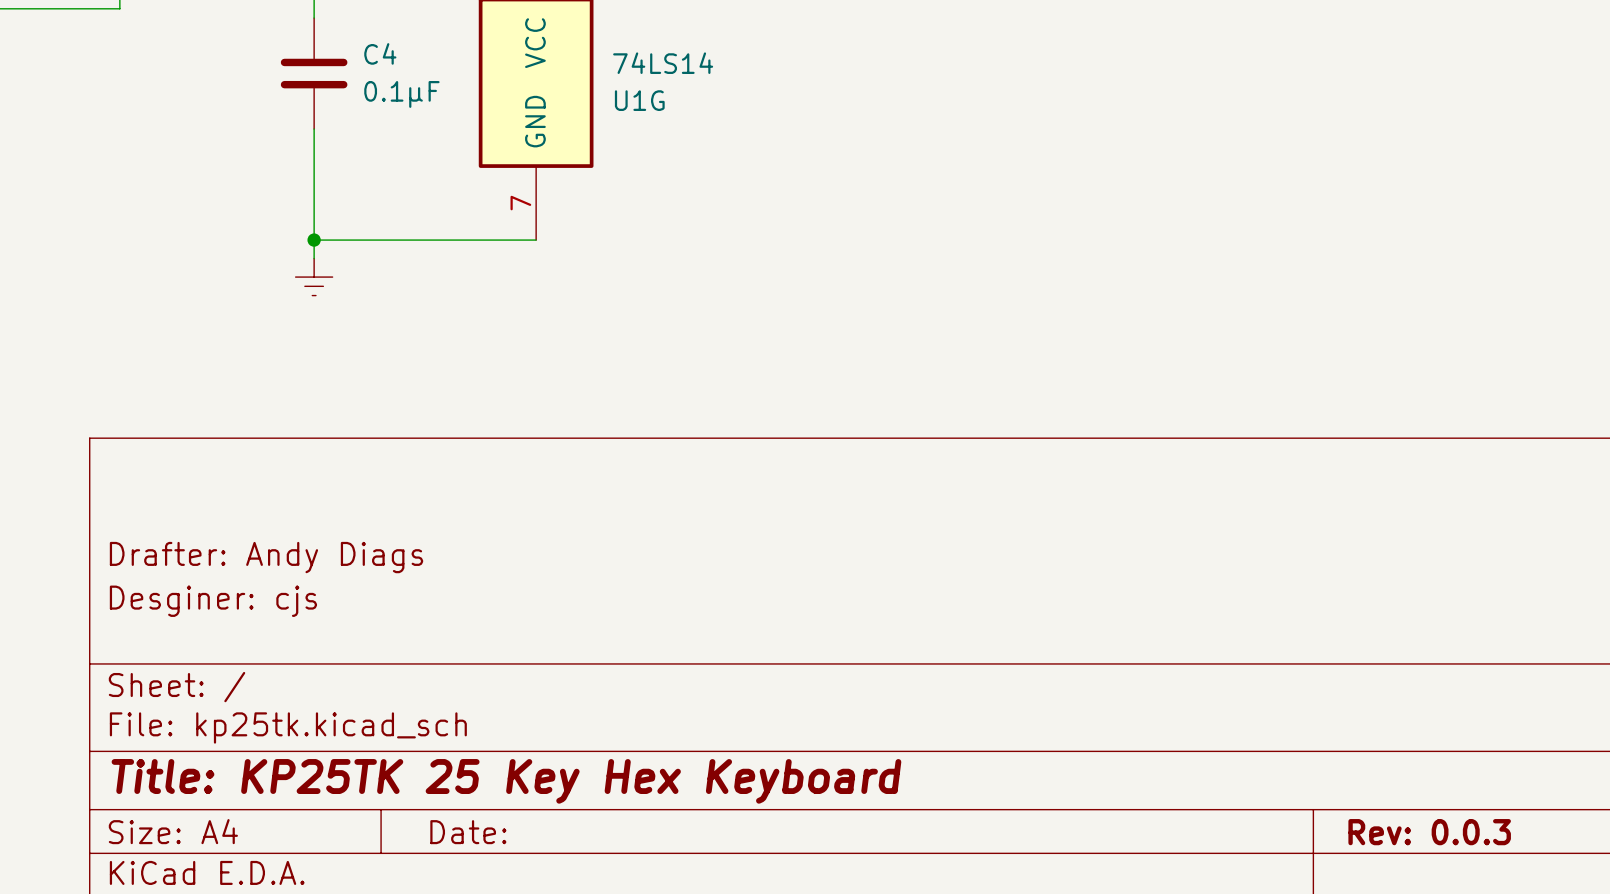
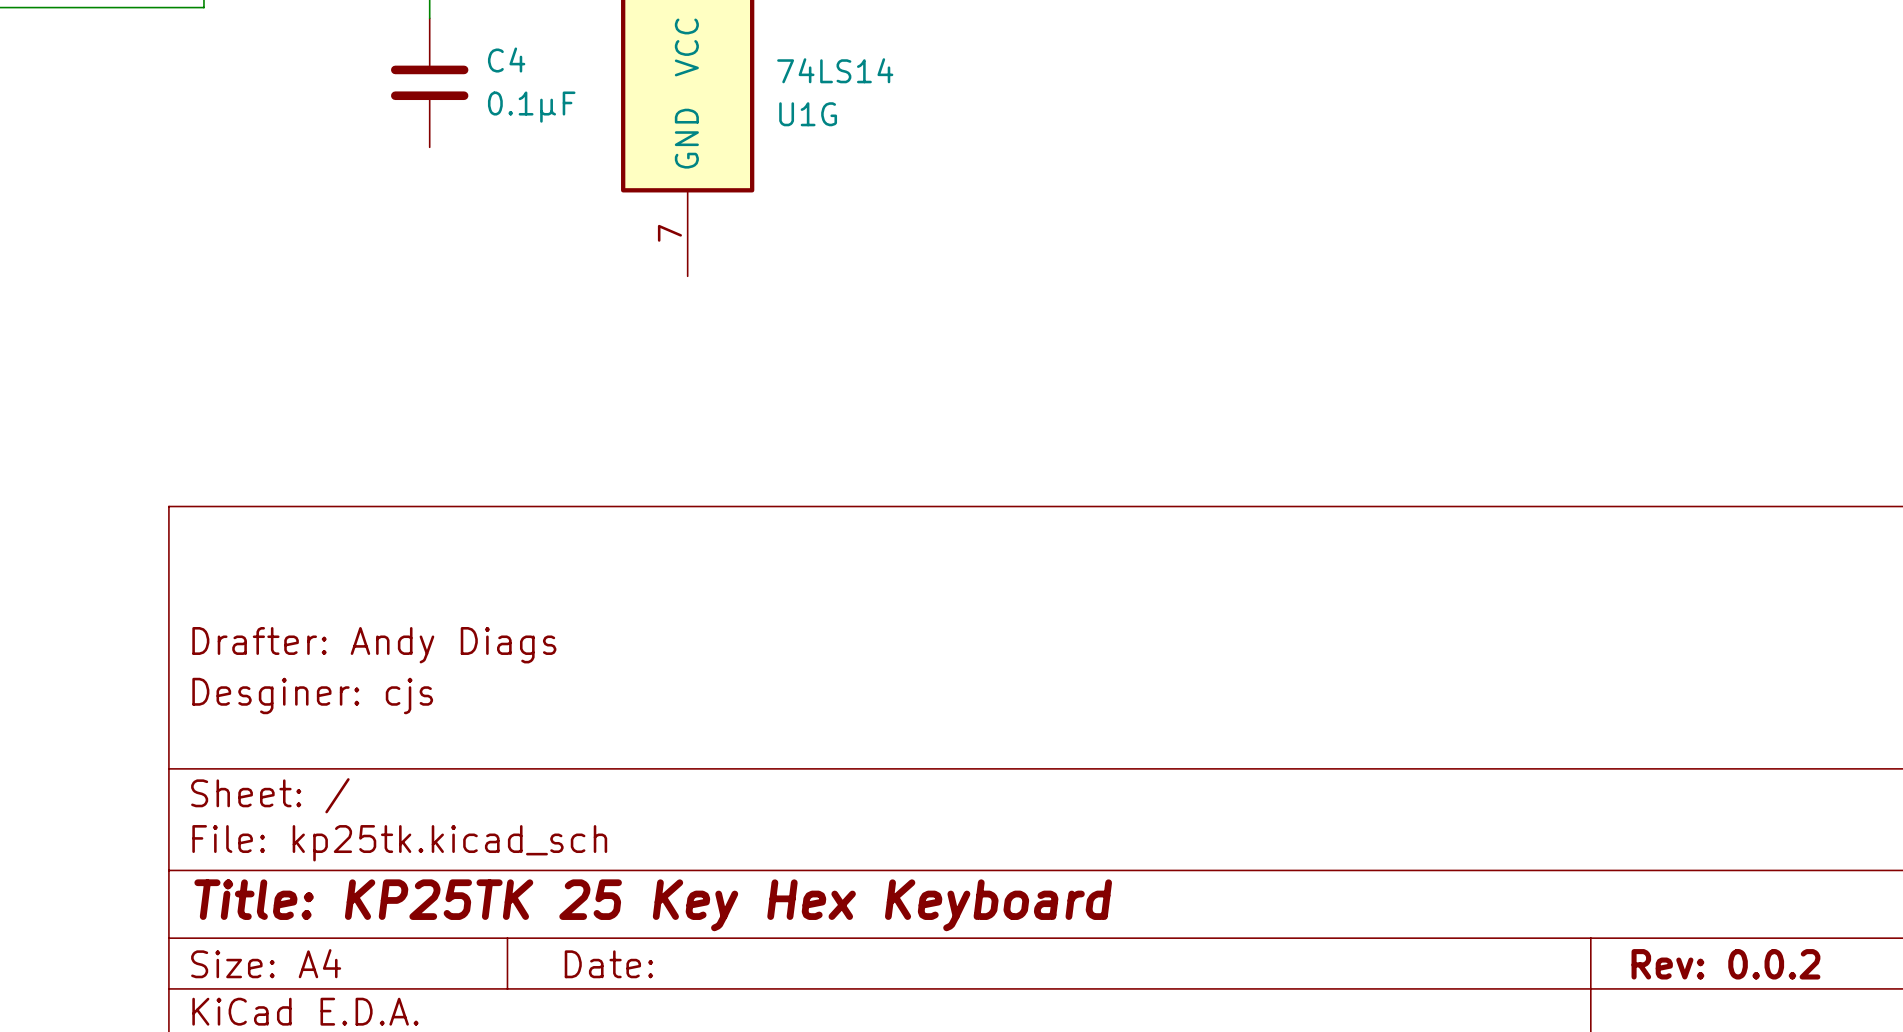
wire: (314, 129) (314, 258) -> none
wire: (314, 240) (536, 240) -> none
junction: (314, 240) -> none
power symbol: (314, 277) -> none
title block: Rev: 0.0.3 (1429, 832) -> Rev: 0.0.2 (1725, 964)

